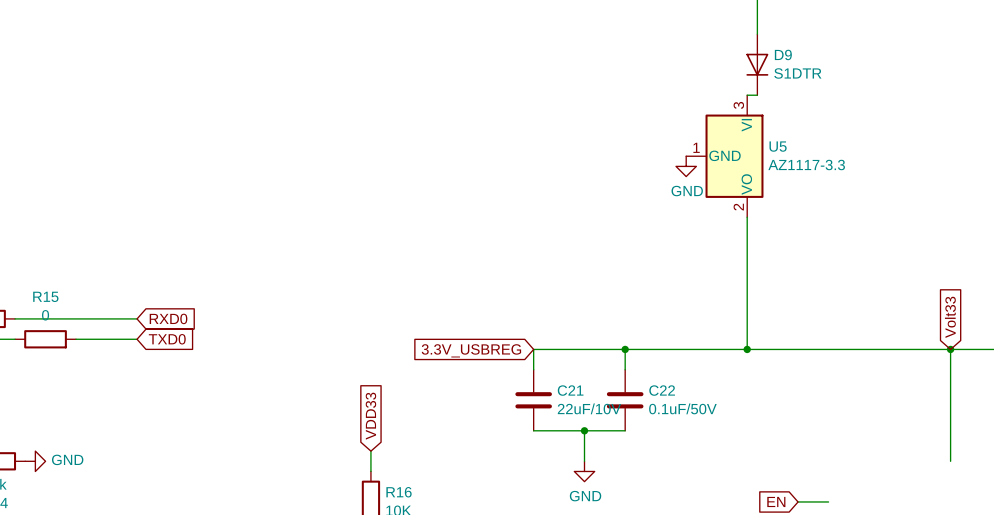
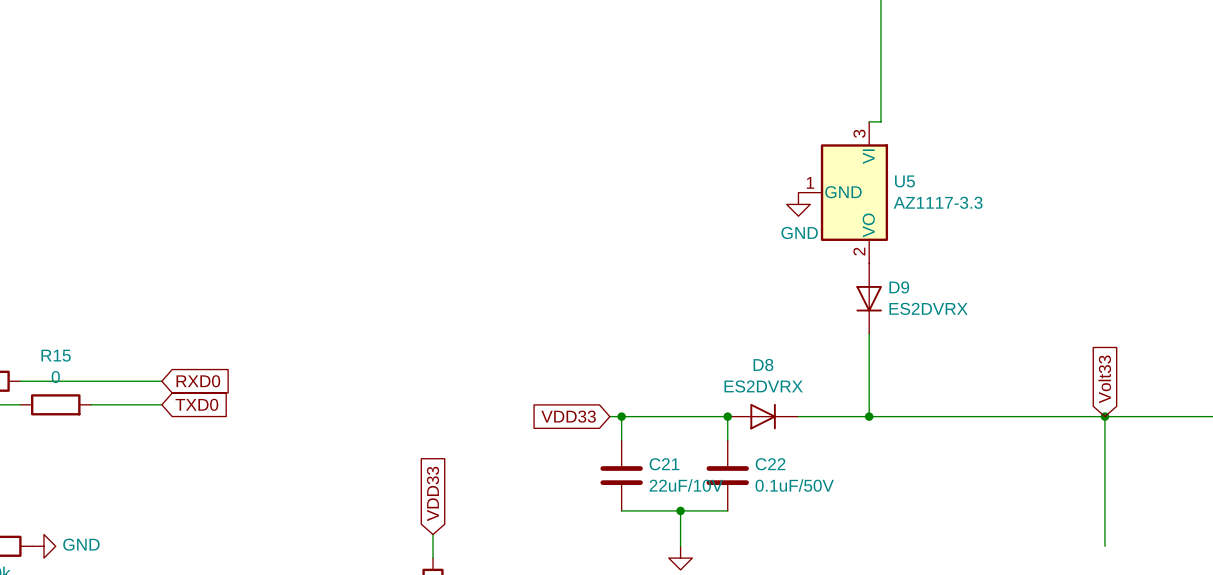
D9 position: (757, 64) -> (869, 298)
D9 value: S1DTR (797, 73) -> ES2DVRX (928, 308)
global label: none -> VDD33 (568, 416)
wire: none -> (609, 416) (621, 416)
junction: none -> (621, 416)
D8: none -> ES2DVRX (763, 416)
global label: 3.3V_USBREG (471, 350) -> none

